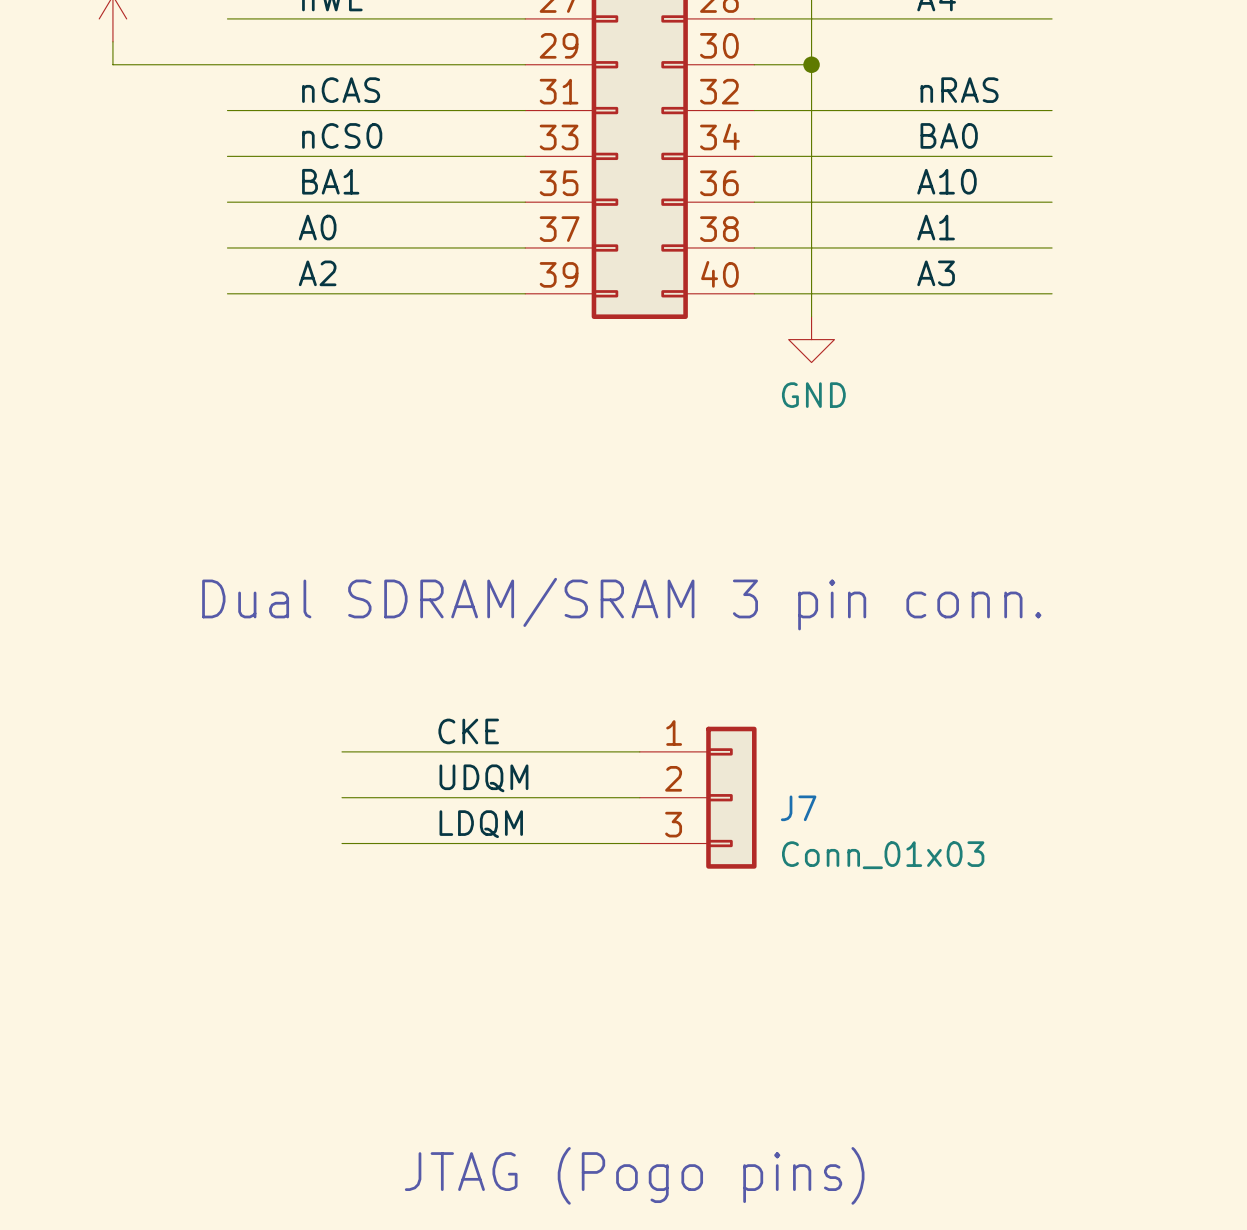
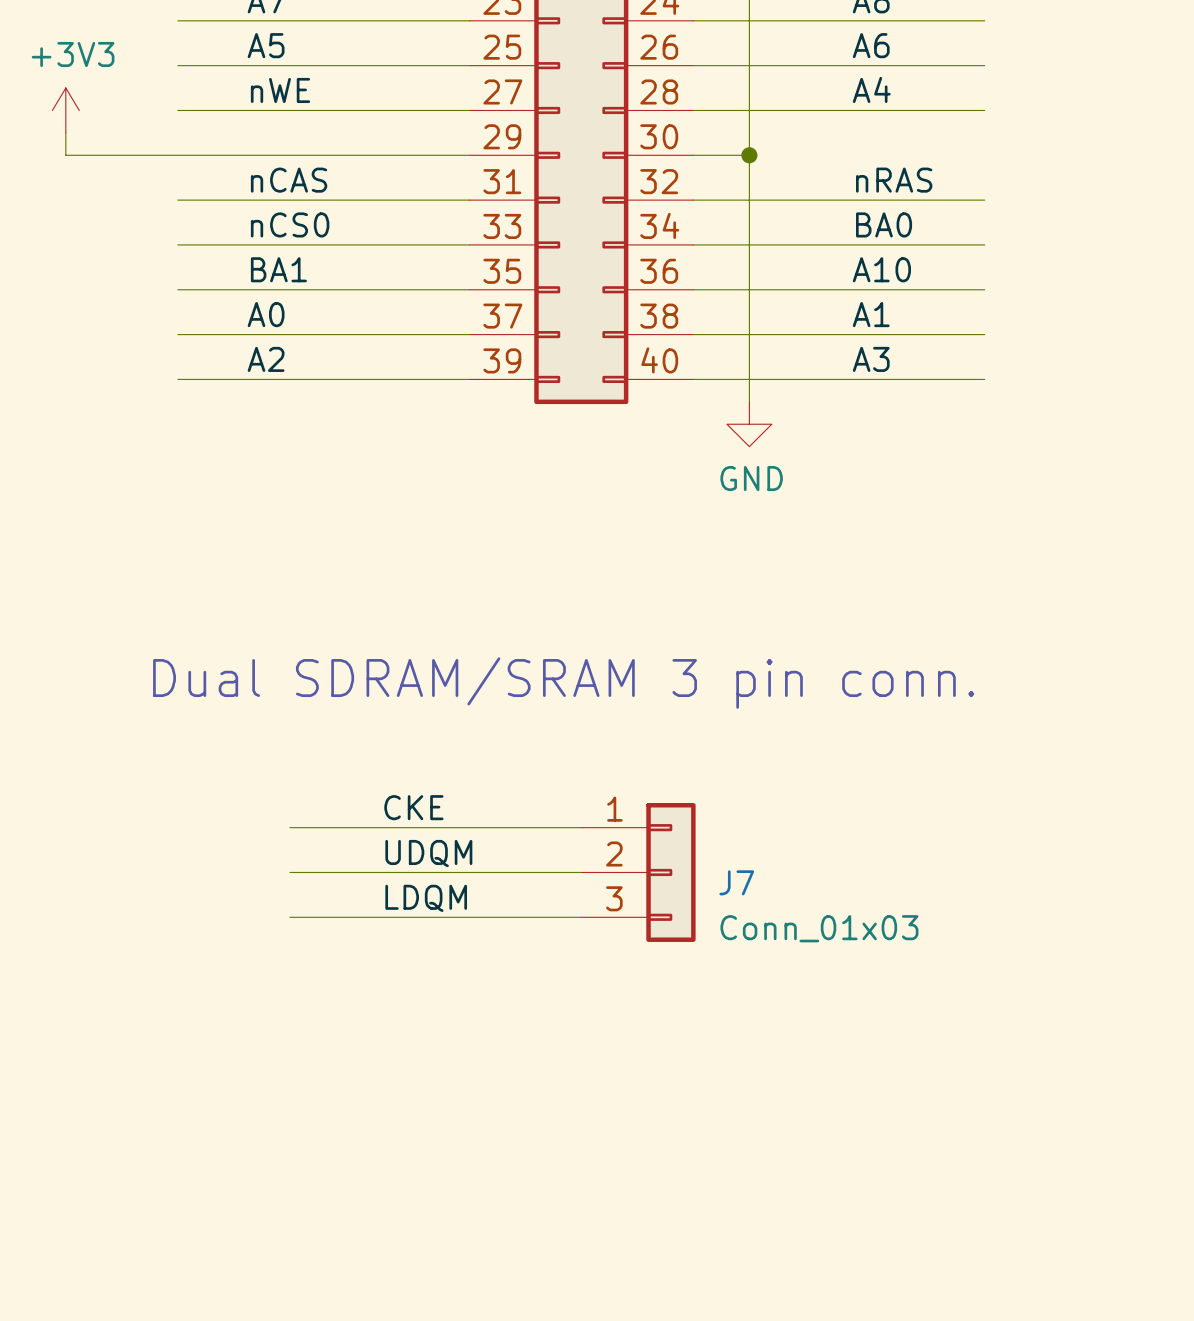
text: JTAG (Pogo pins) (634, 1175) -> none

